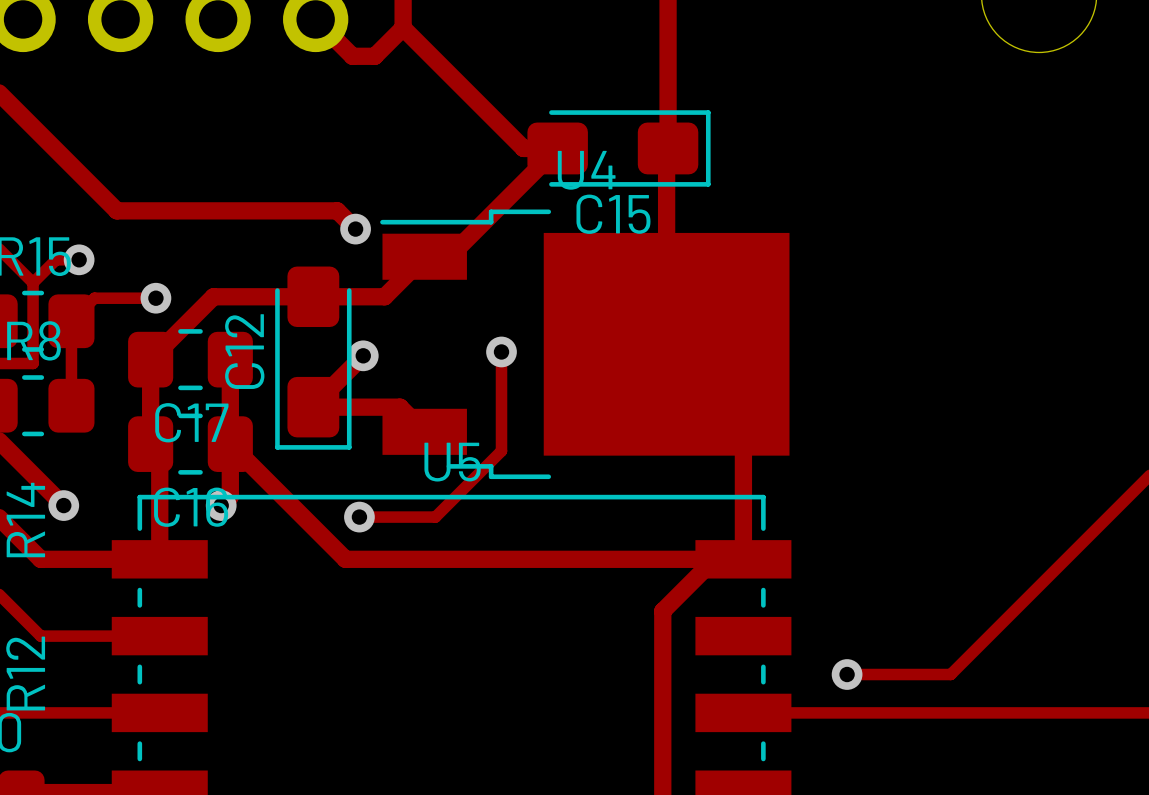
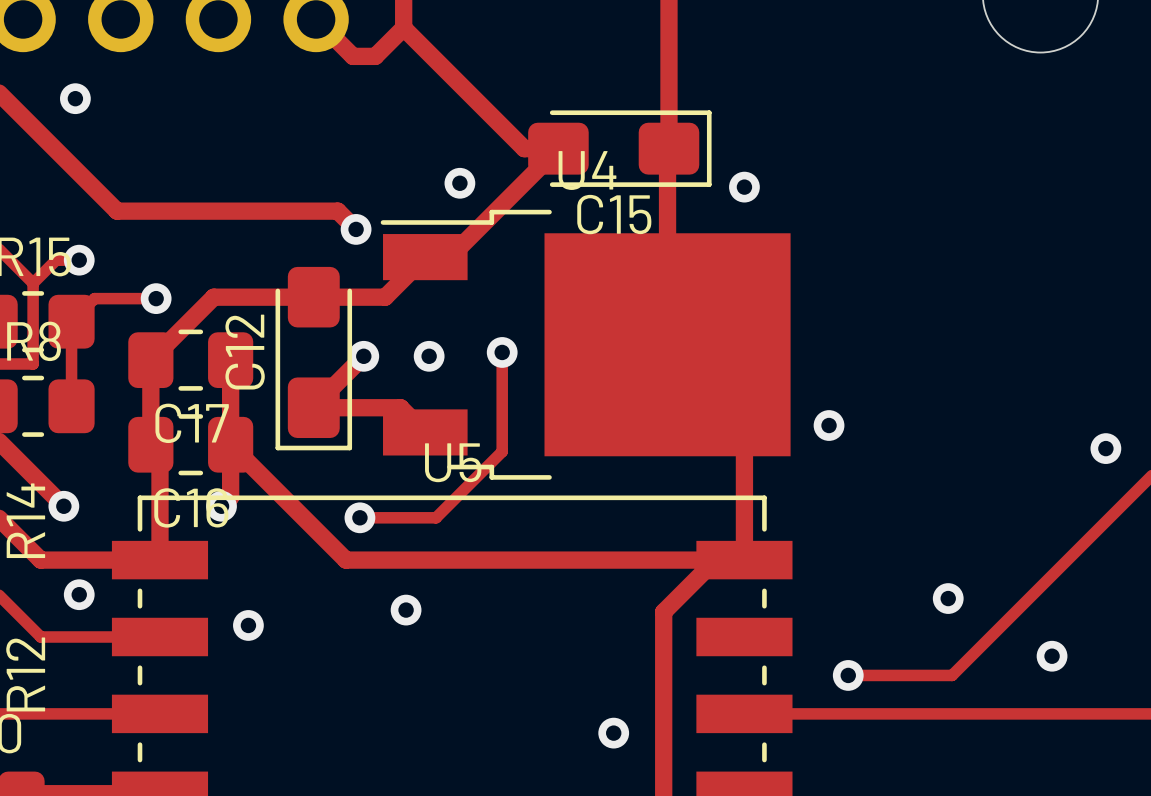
via: none -> (75, 98)
via: none -> (459, 183)
via: none -> (744, 187)
via: none -> (429, 356)
via: none -> (829, 425)
via: none -> (1105, 448)
via: none -> (79, 594)
via: none -> (948, 598)
via: none -> (406, 610)
via: none -> (248, 625)
via: none -> (1052, 656)
via: none -> (613, 733)

